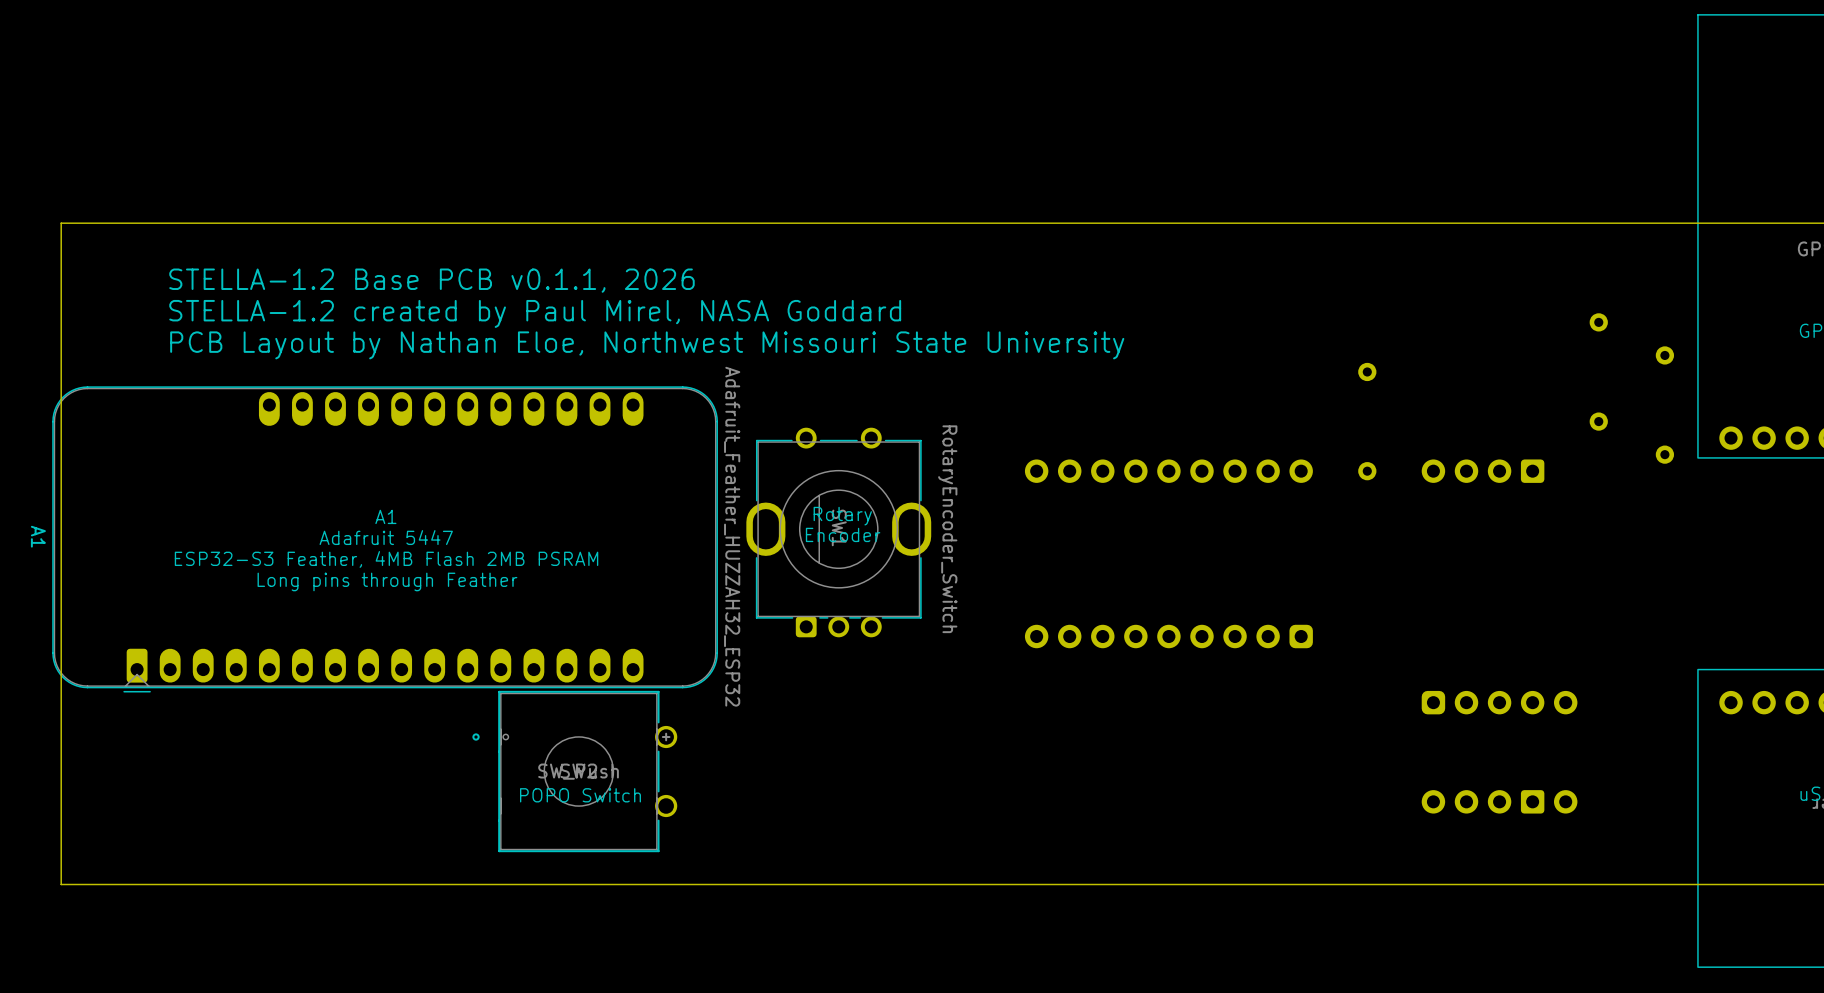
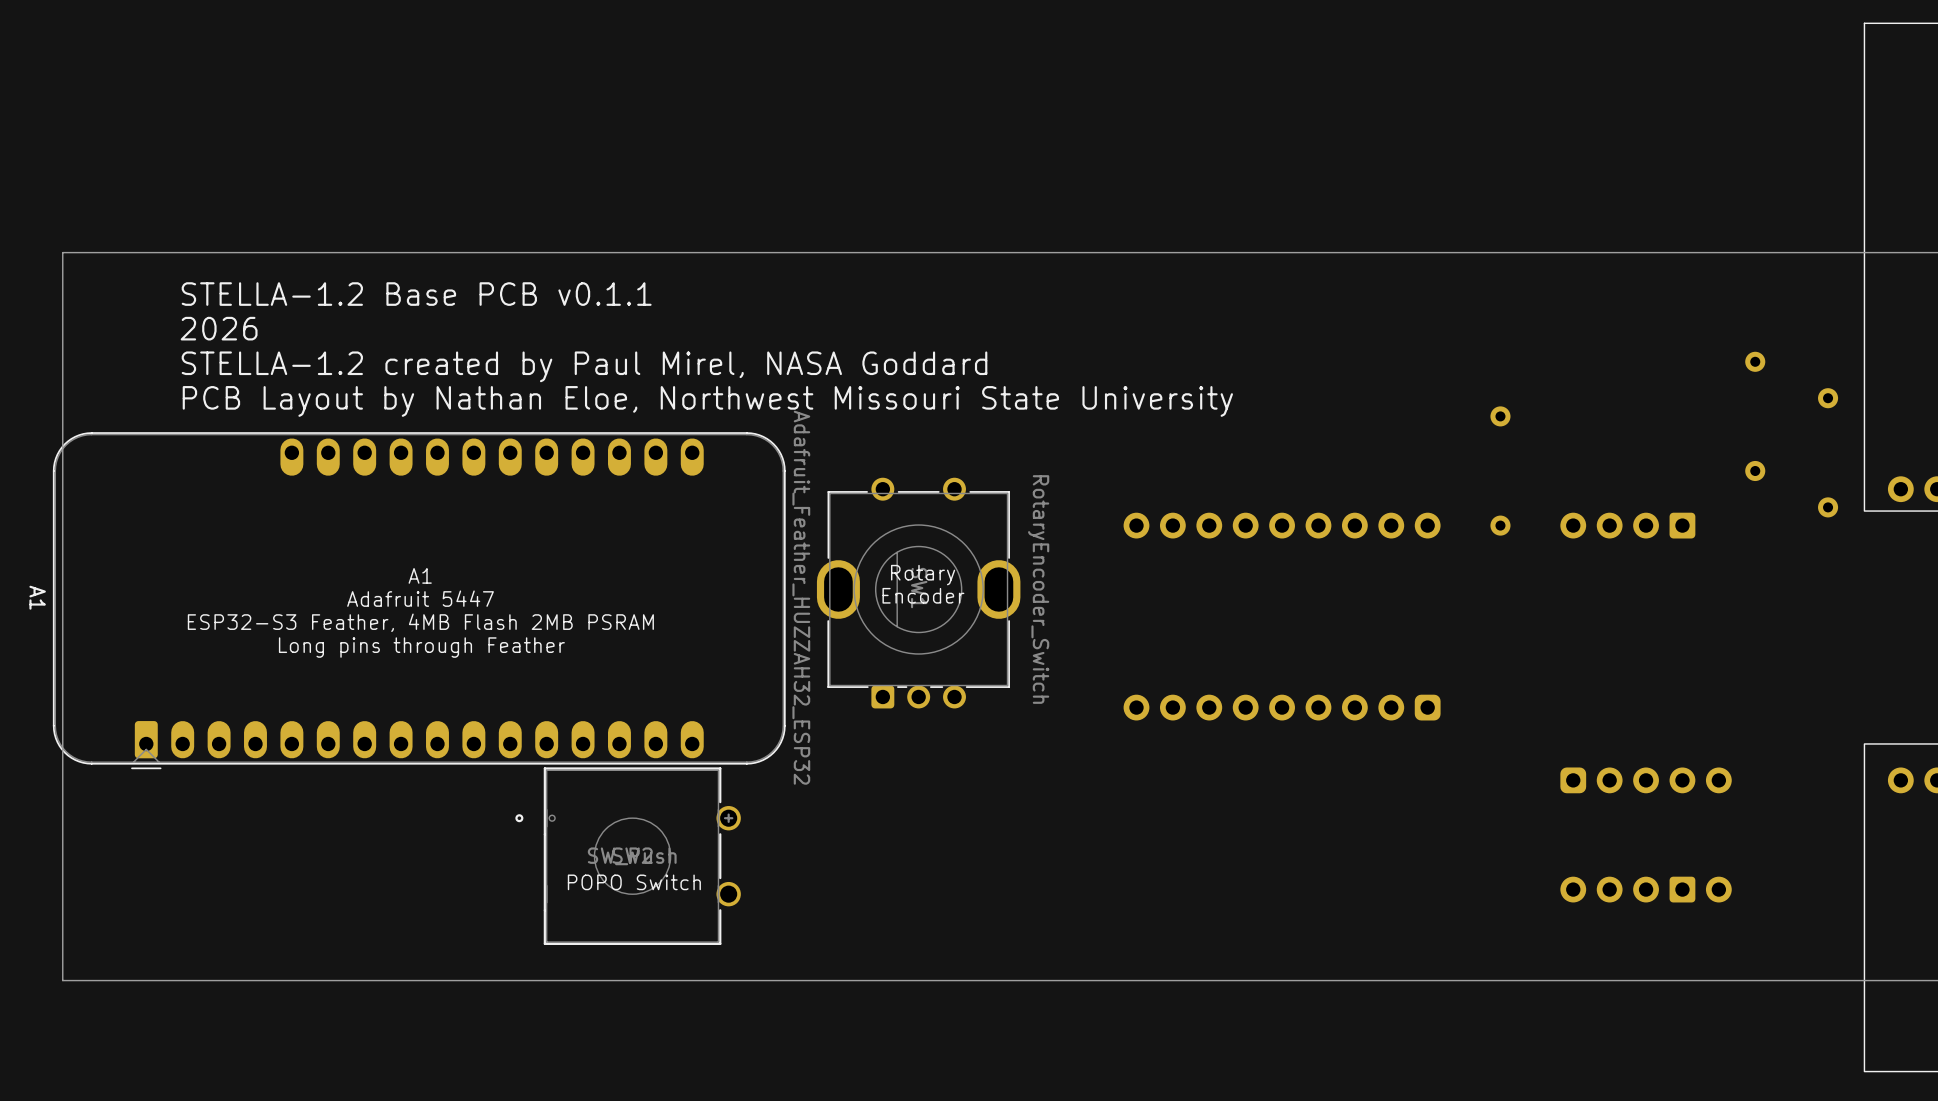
text: STELLA-1.2 Base PCB v0.1.1, 2026 (431, 280) -> STELLA-1.2 Base PCB v0.1.1 (416, 294)
text: none -> 2026 (219, 328)
text position: STELLA-1.2 created by Paul Mirel, NASA Goddard (535, 313) -> STELLA-1.2 created by Paul Mirel, NASA Goddard (584, 366)
text position: PCB Layout by Nathan Eloe, Northwest Missouri State University (647, 345) -> PCB Layout by Nathan Eloe, Northwest Missouri State University (707, 401)

